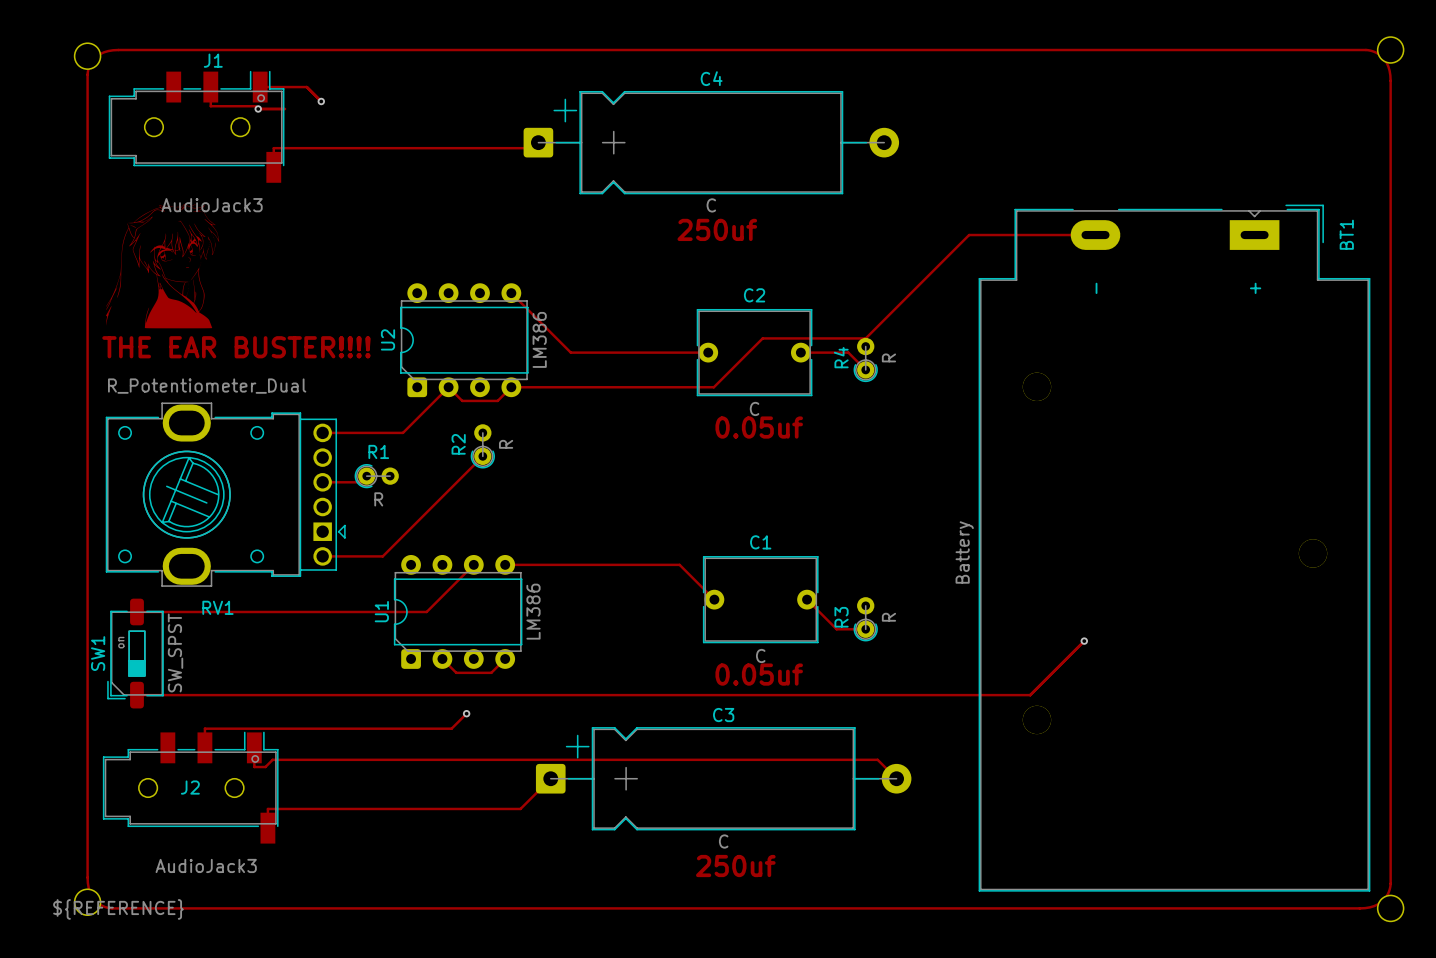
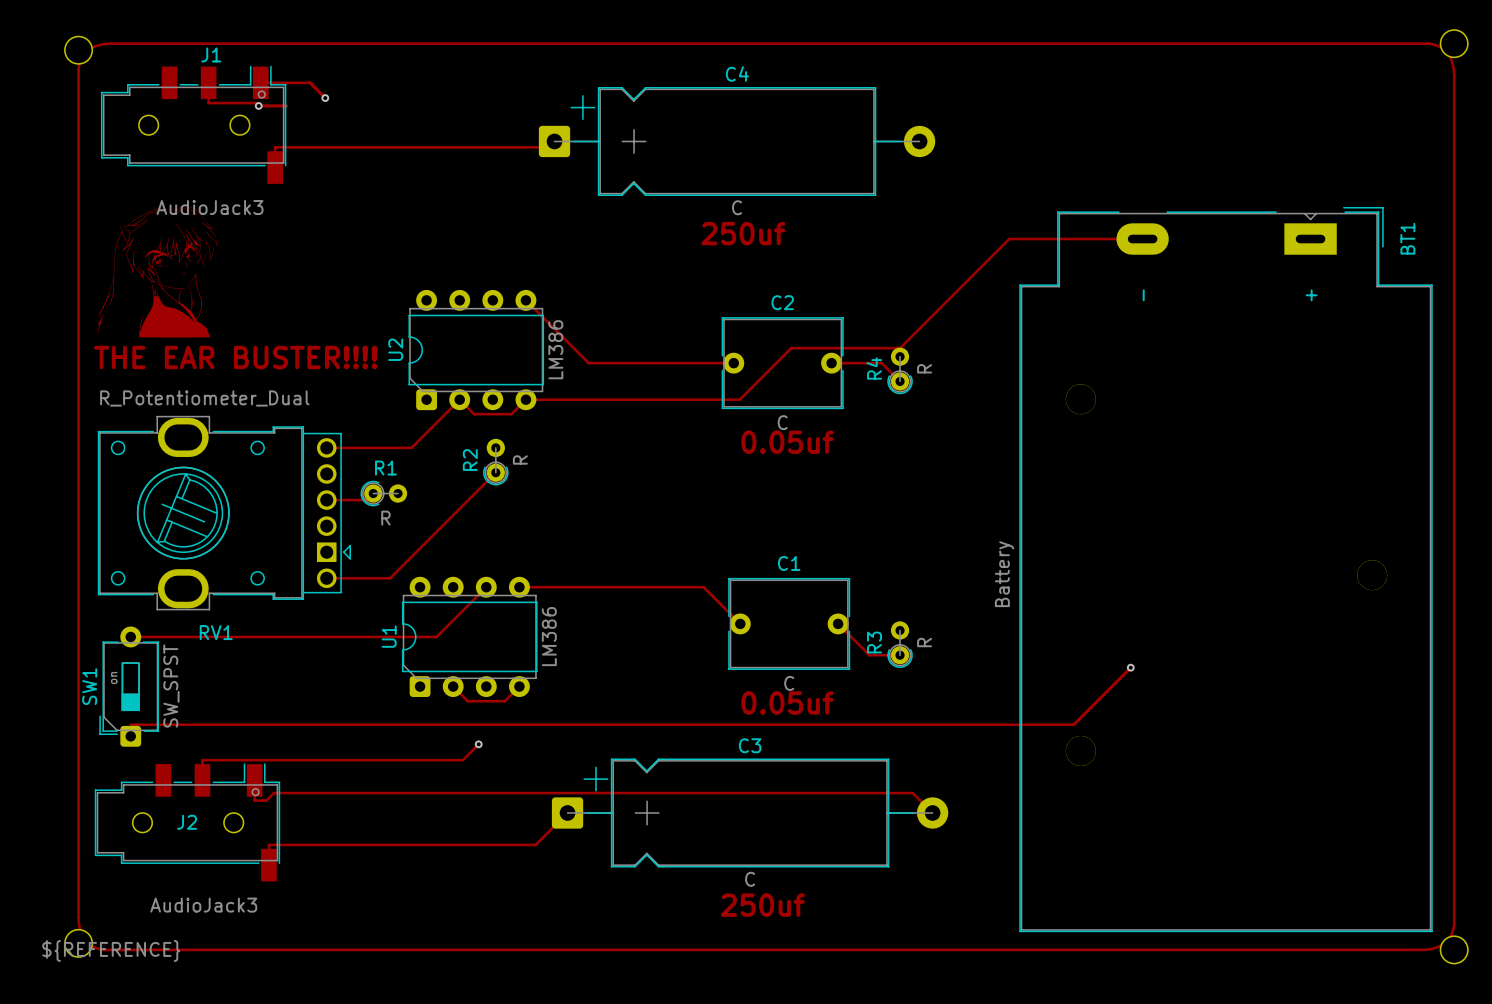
SW1 footprint: [107, 598, 164, 709] -> [99, 626, 160, 747]

